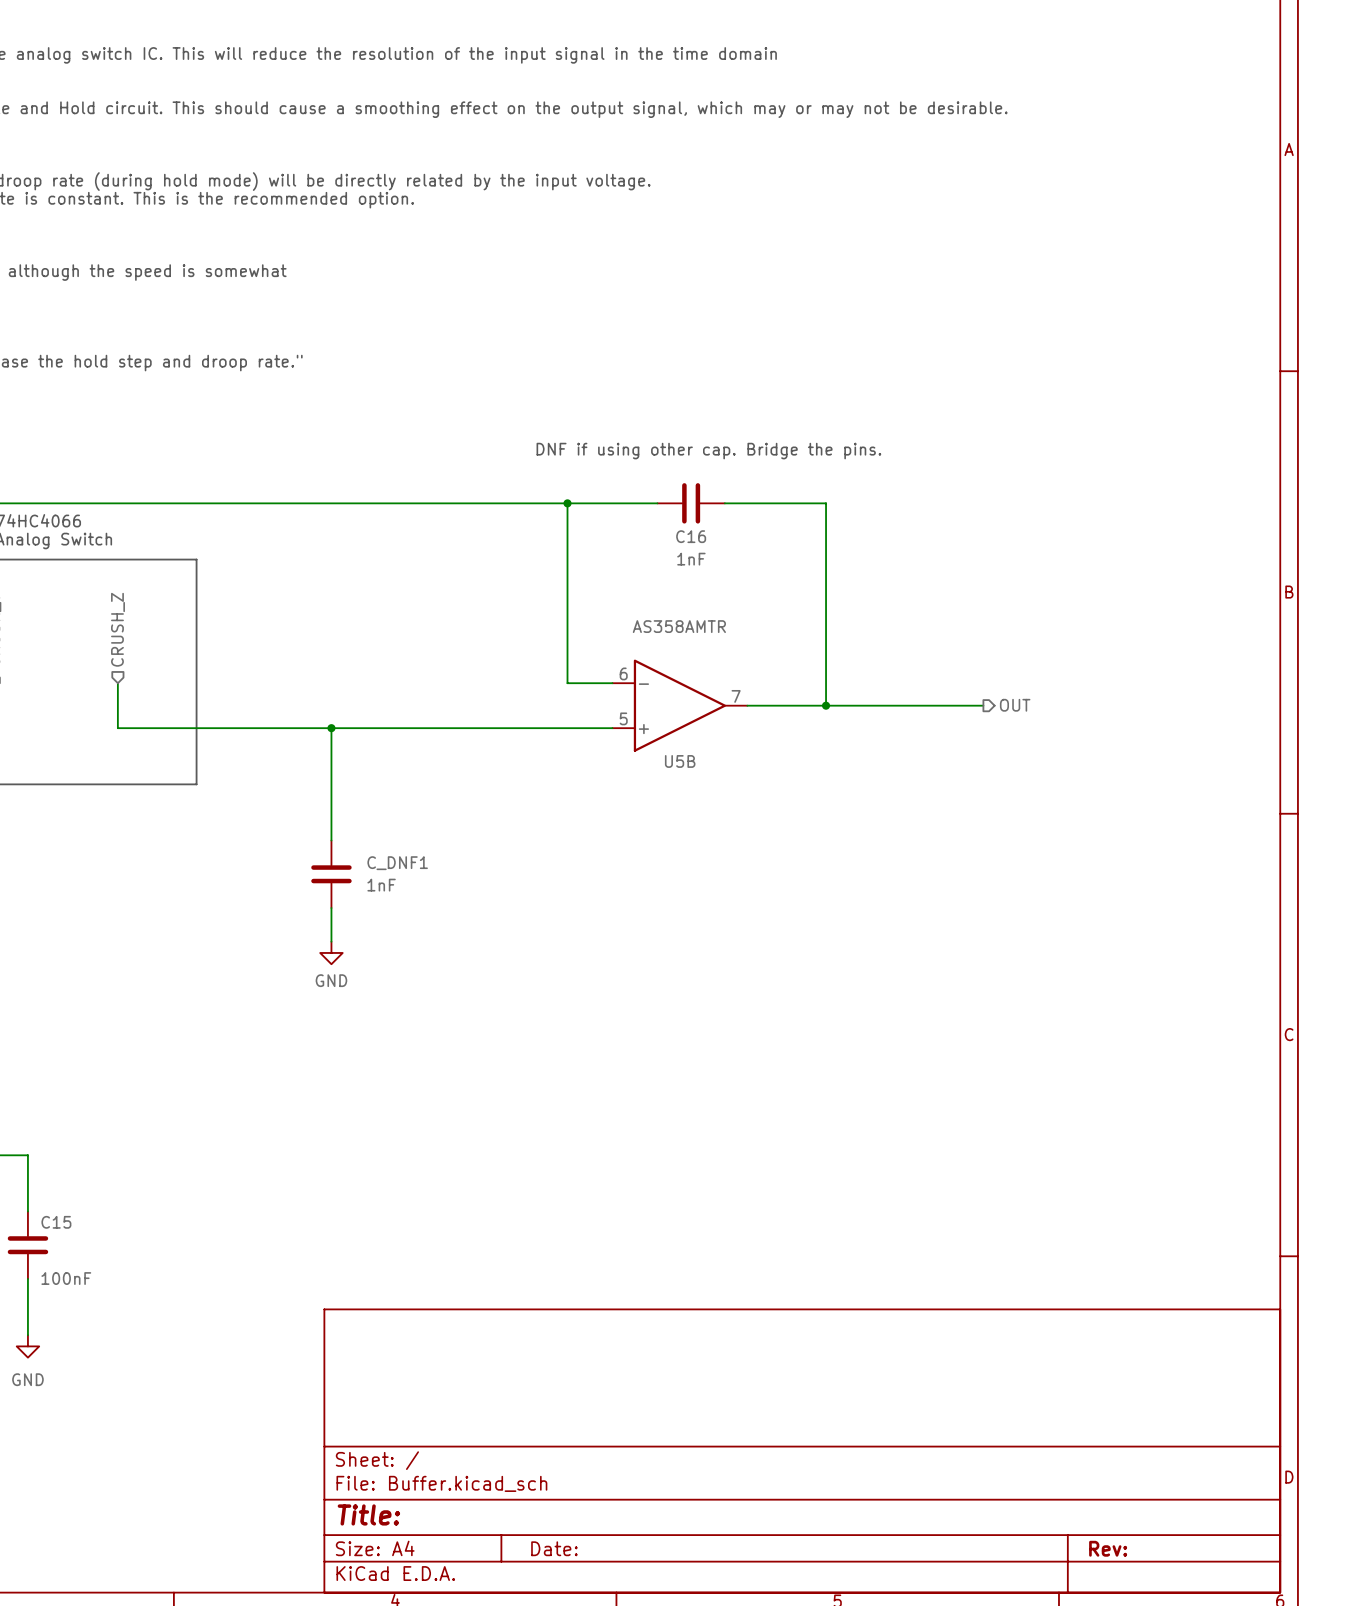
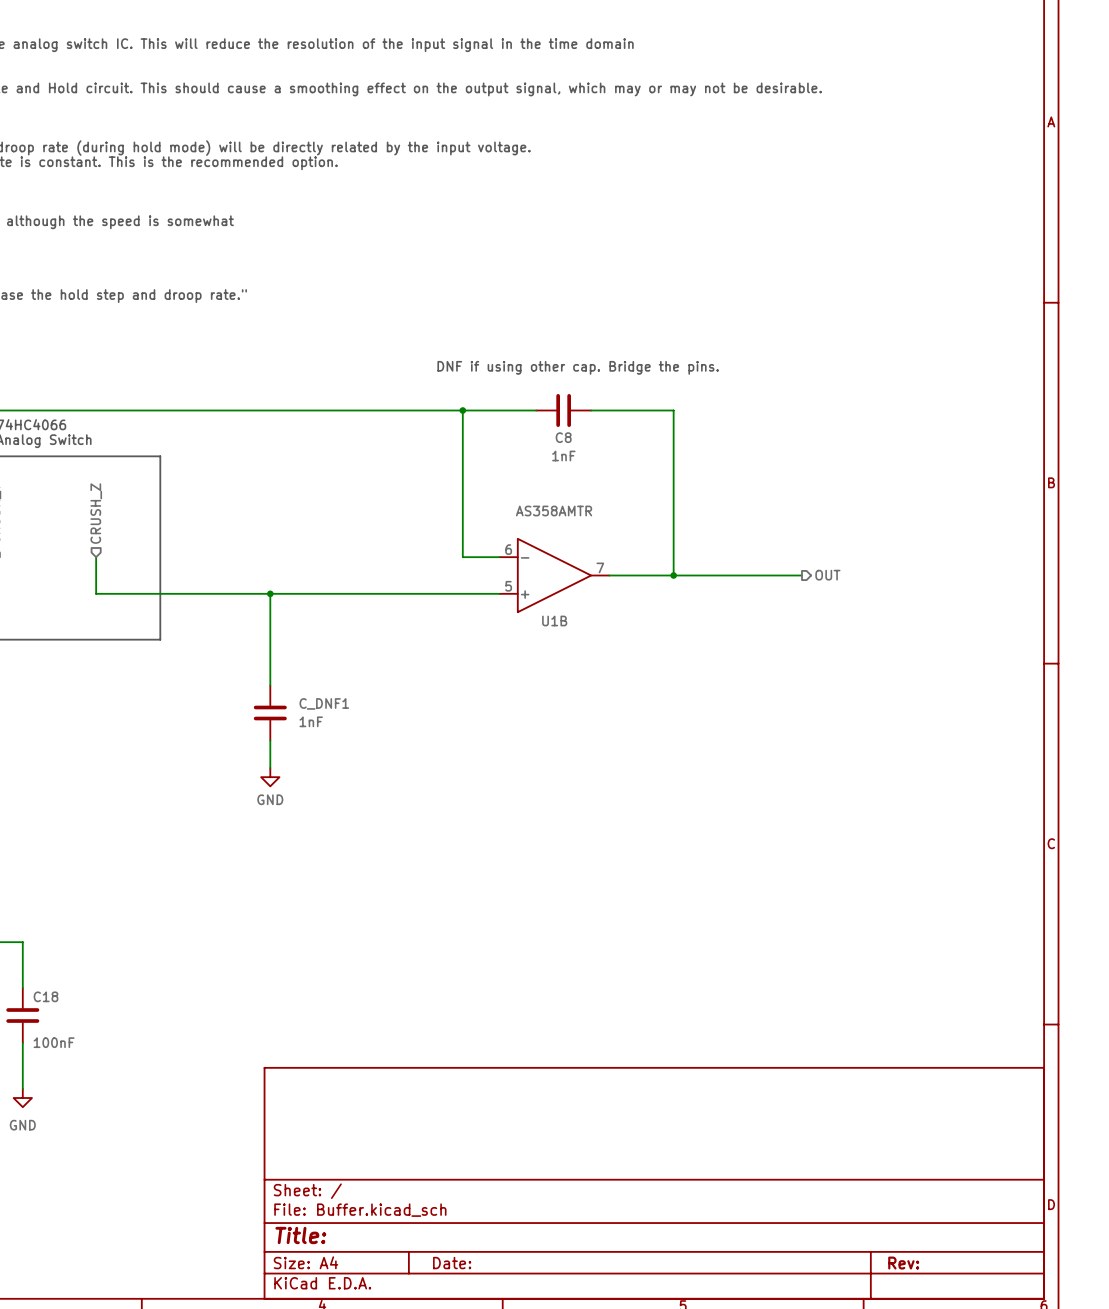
C16 name: C16 (691, 536) -> C8 (563, 437)
U5B name: U5B (680, 761) -> U1B (554, 620)
C15 name: C15 (56, 1222) -> C18 (46, 996)

